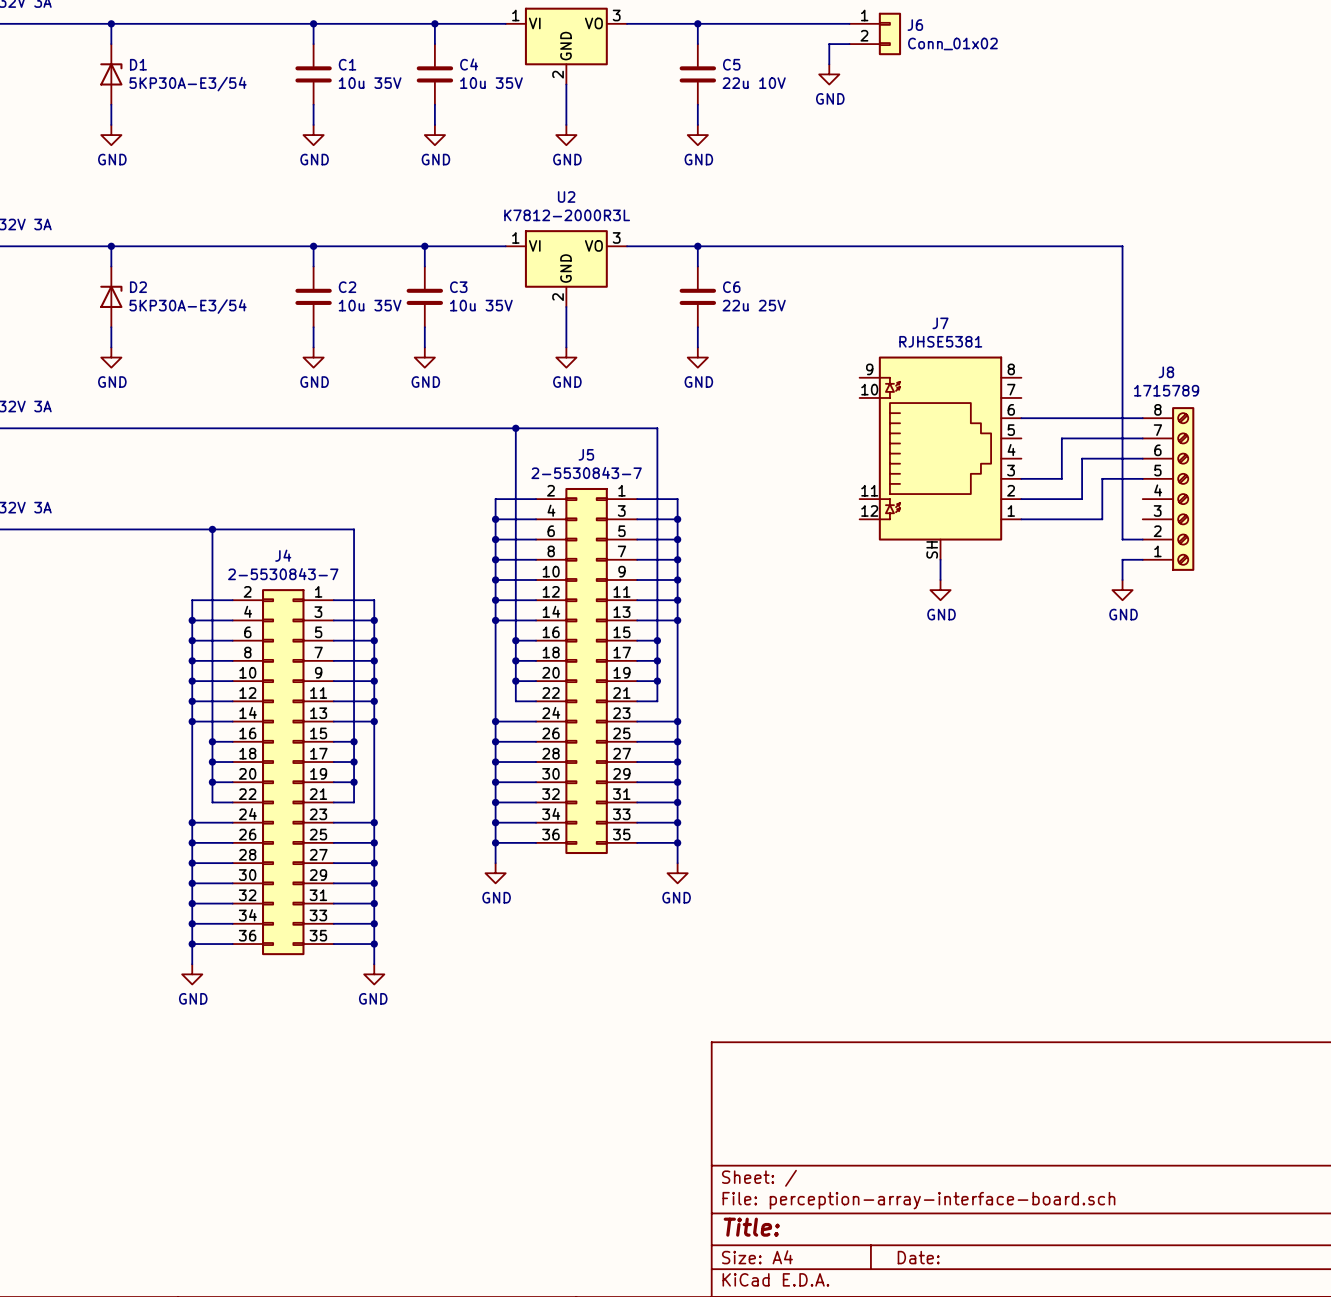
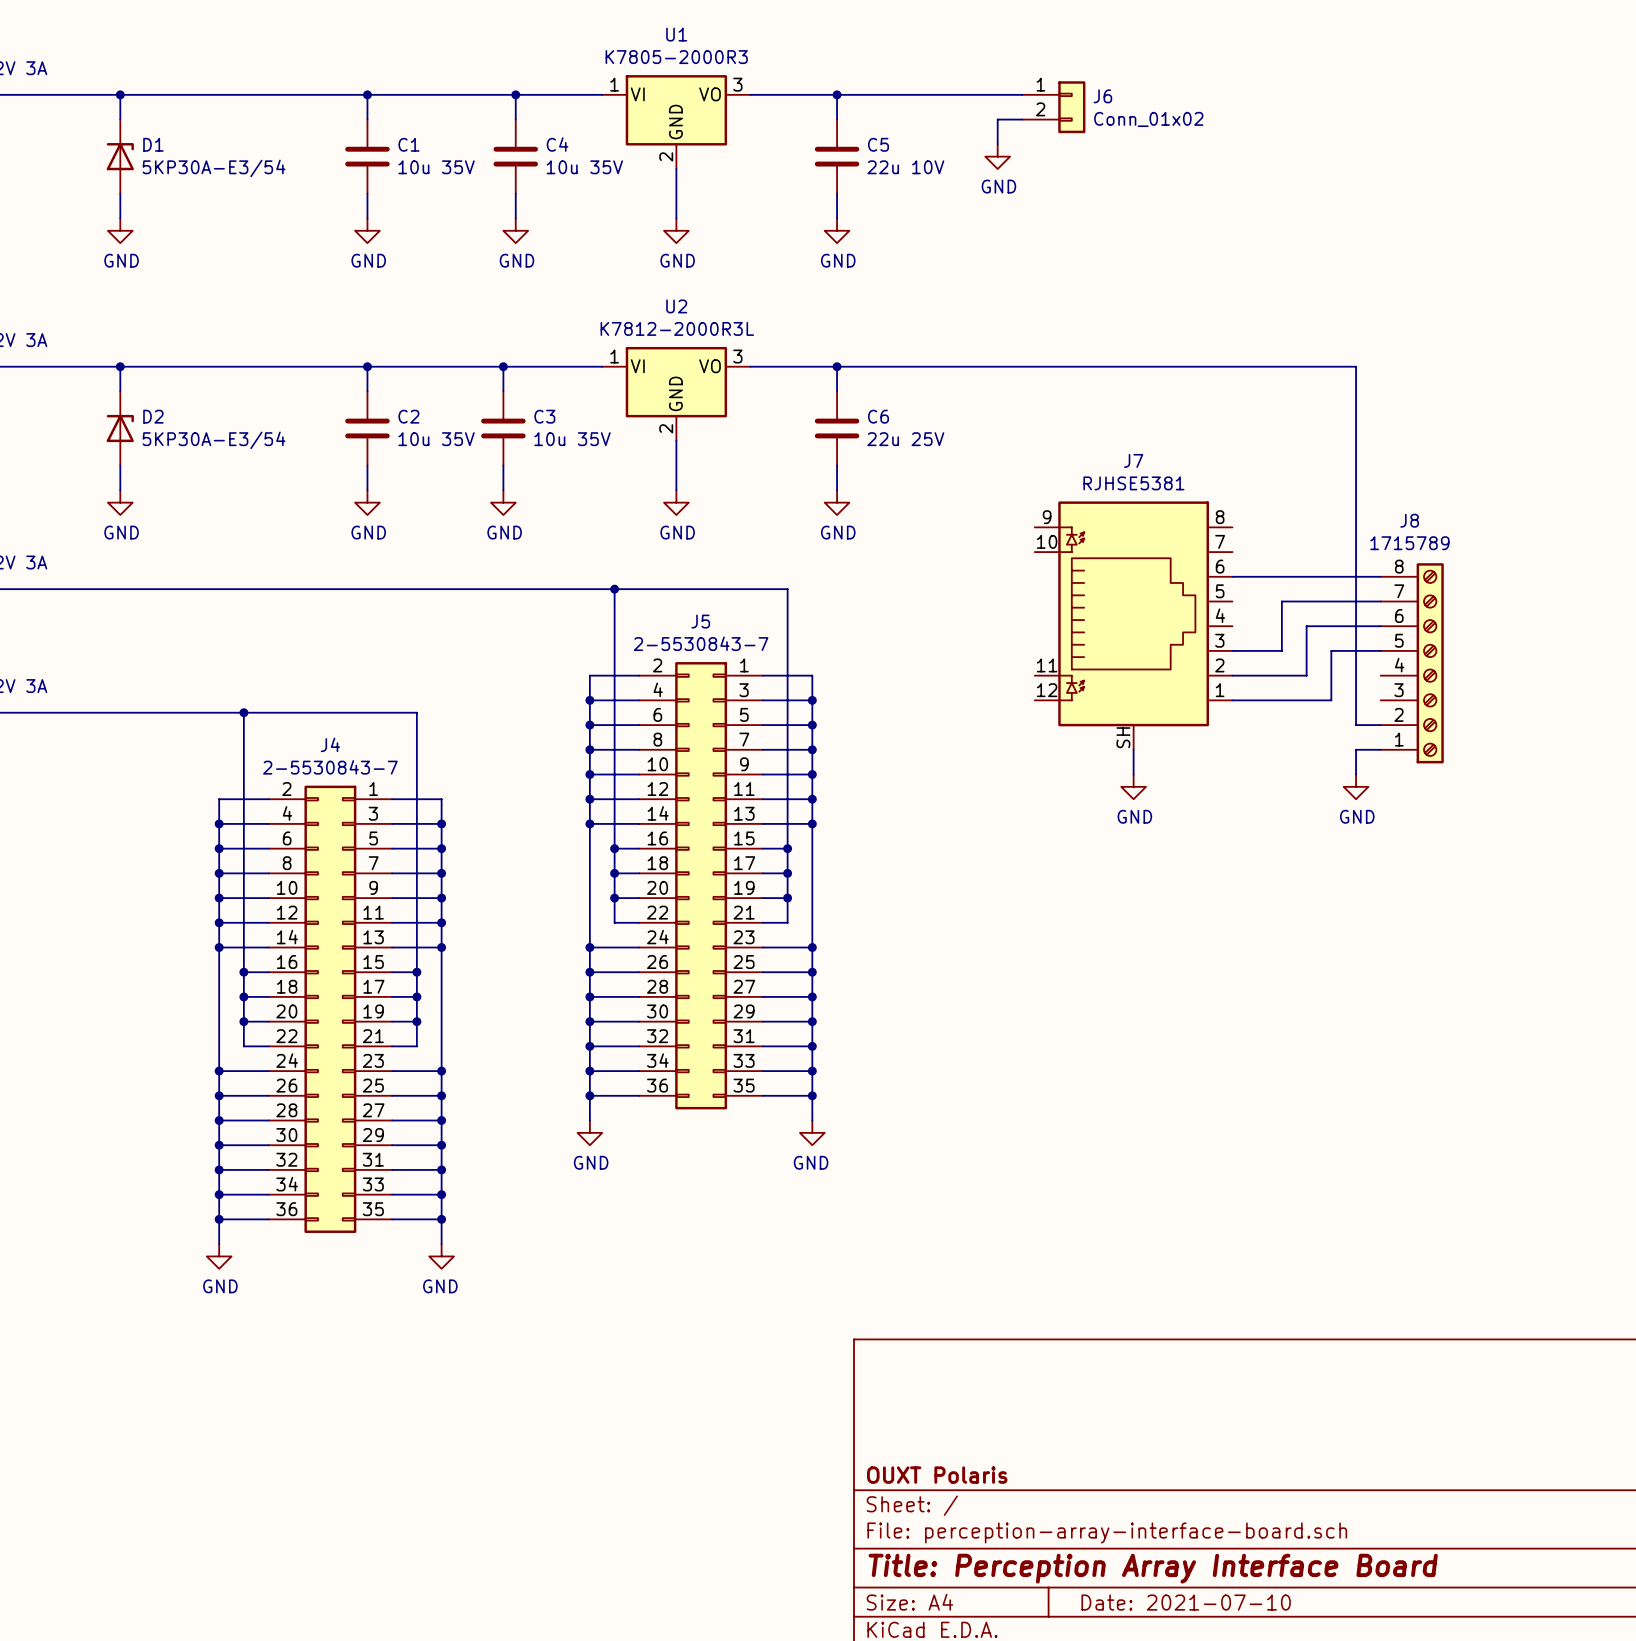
title block: none -> OUXT Polaris (937, 1475)
title block: Title: (751, 1227) -> Title: Perception Array Interface Board (1153, 1568)
title block: Date: (918, 1257) -> Date: 2021-07-10 (1186, 1602)

